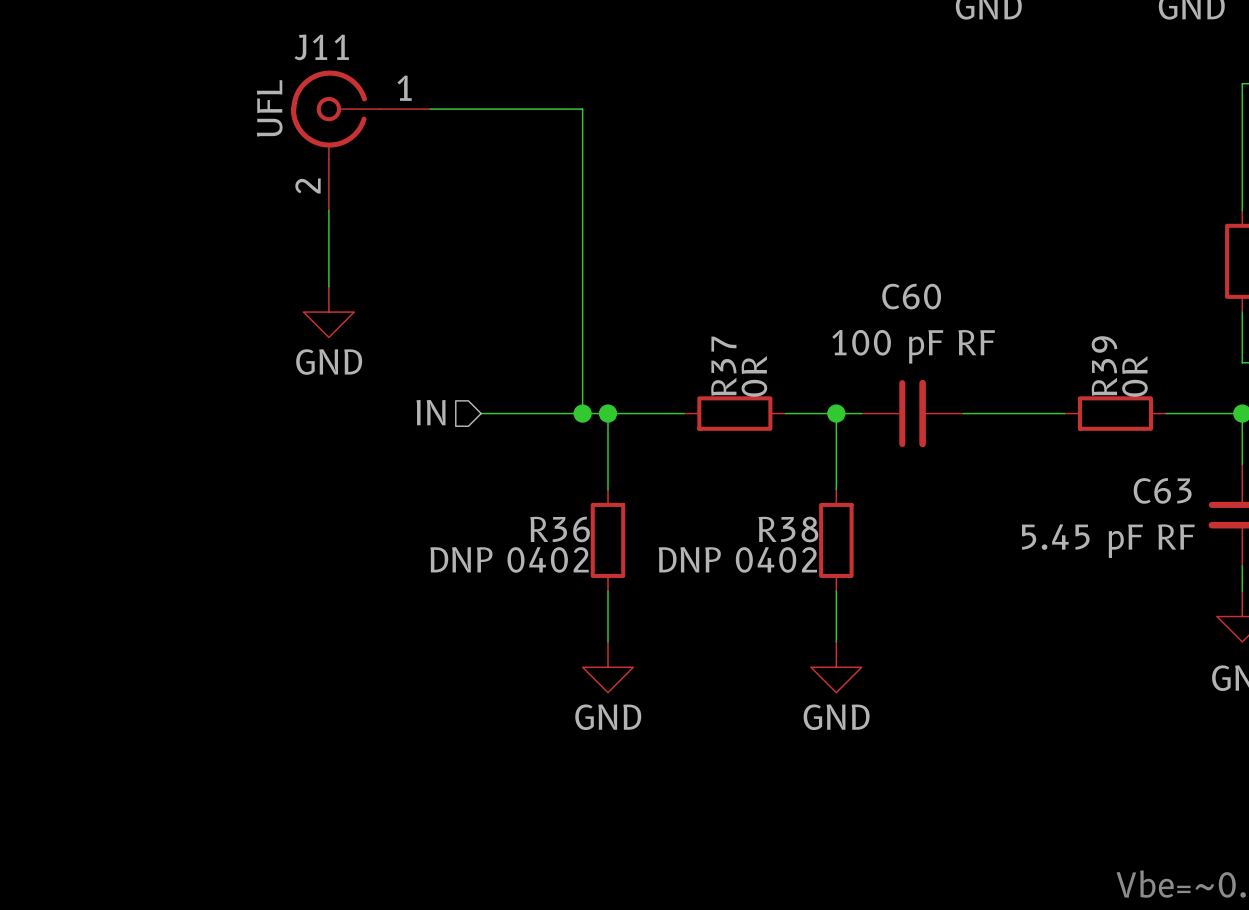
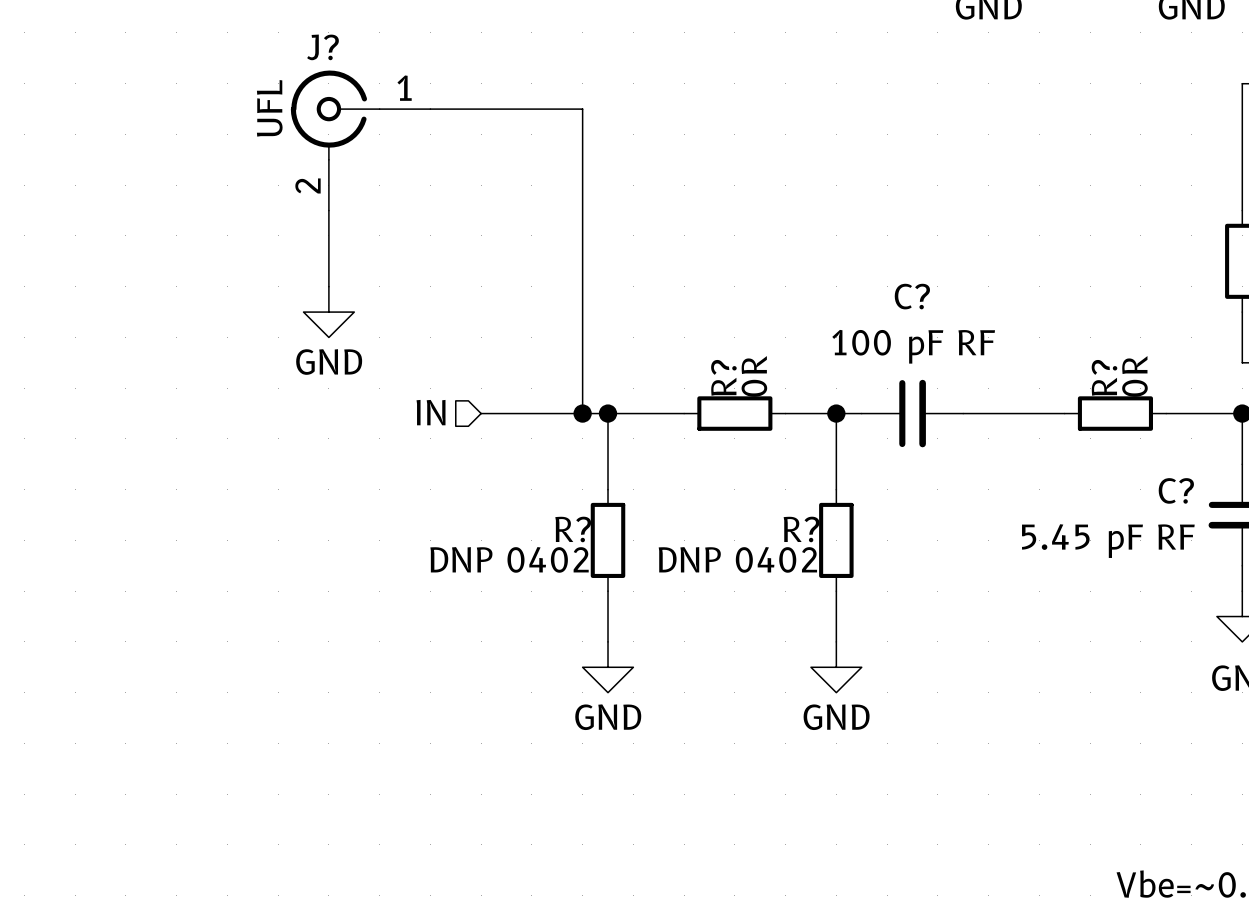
J11 name: J11 (321, 47) -> J? (323, 47)
C60 name: C60 (911, 296) -> C? (912, 296)
R39 name: R39 (1104, 365) -> R? (1104, 377)
R37 name: R37 (723, 366) -> R? (723, 377)
C63 name: C63 (1162, 490) -> C? (1176, 490)
R36 name: R36 (560, 529) -> R? (573, 529)
R38 name: R38 (788, 529) -> R? (801, 529)

